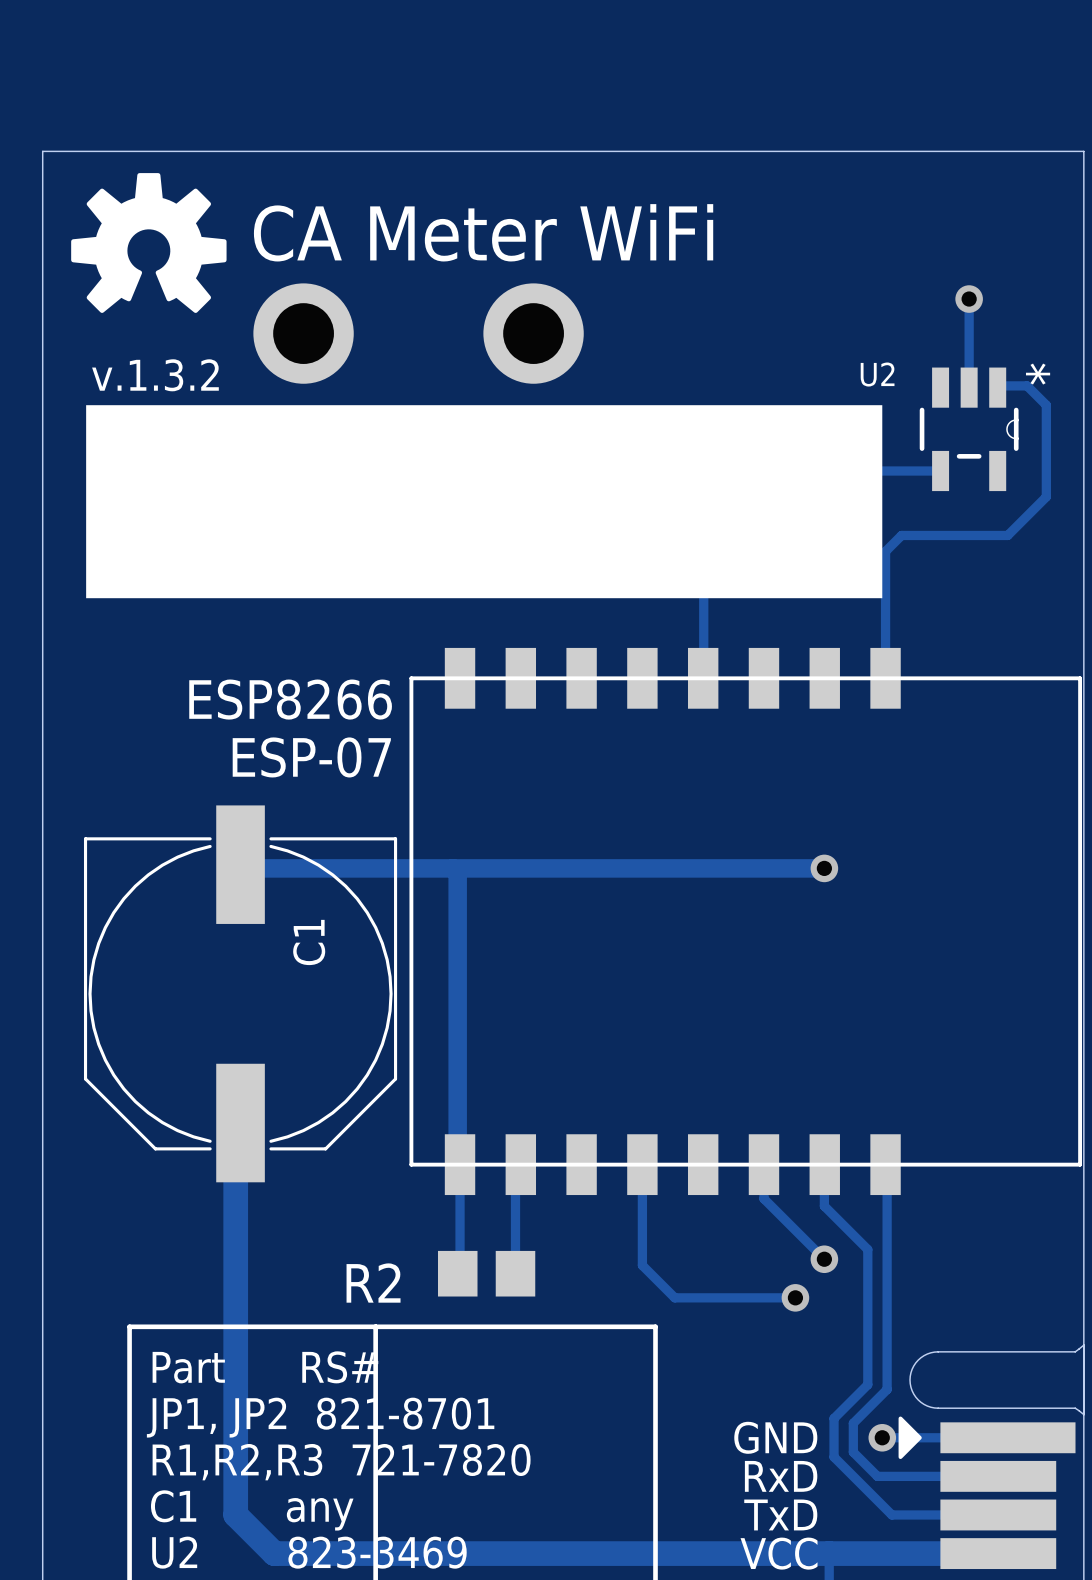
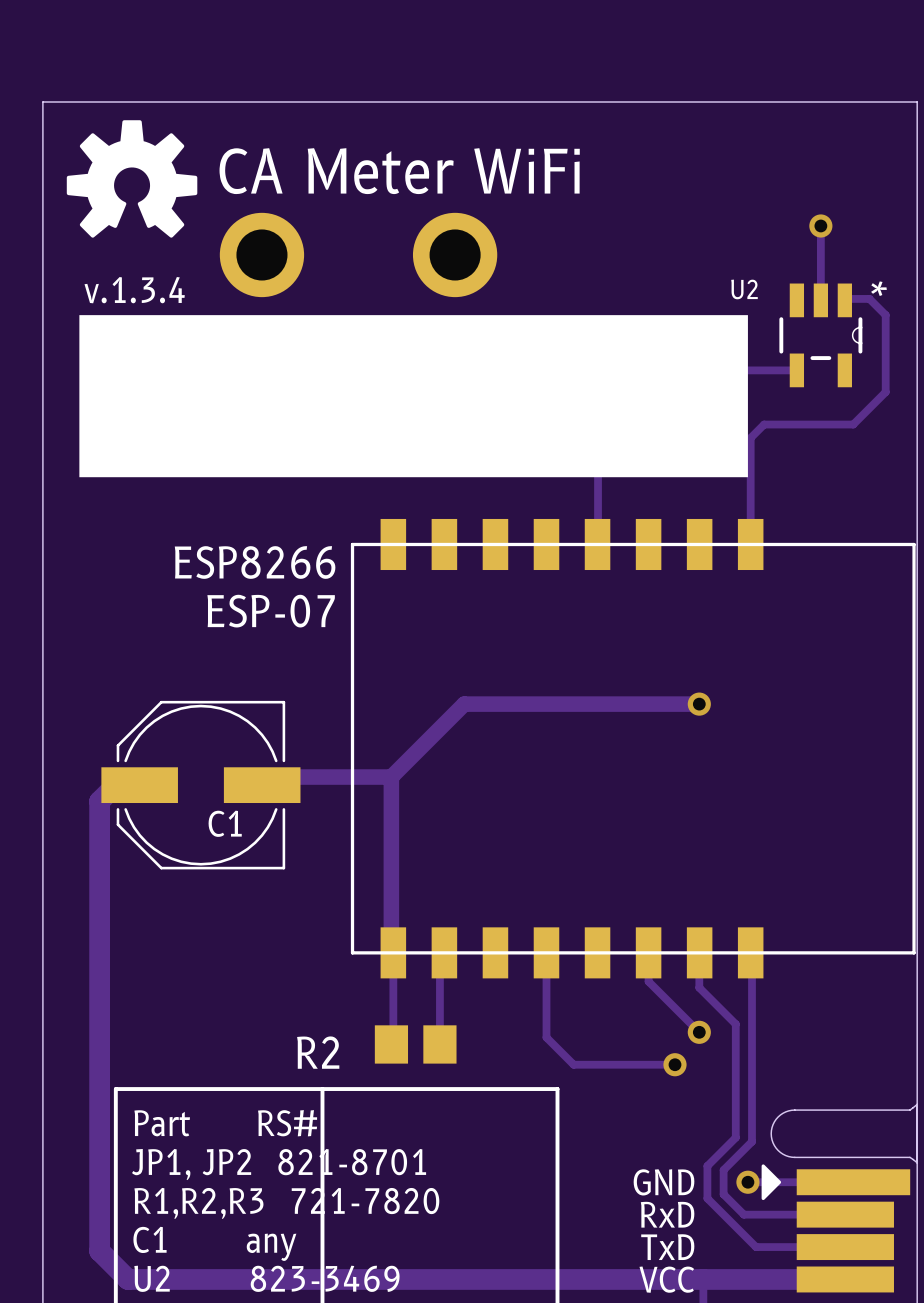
text: v.1.3.2 (155, 375) -> v.1.3.4 (134, 290)
C1 footprint: [83, 805, 398, 1183] -> [101, 700, 301, 870]
track: (240, 864) (236, 868) (544, 868) -> (262, 785) (270, 777) (391, 777) (464, 704)
track: (452, 868) (457, 873) (457, 955) -> none
C1 name position: C1 (309, 942) -> C1 (225, 823)
track: (240, 1123) (235, 1127) (235, 1514) (274, 1553) -> (140, 785) (115, 785) (99, 801) (99, 1251) (127, 1279) (237, 1279)

